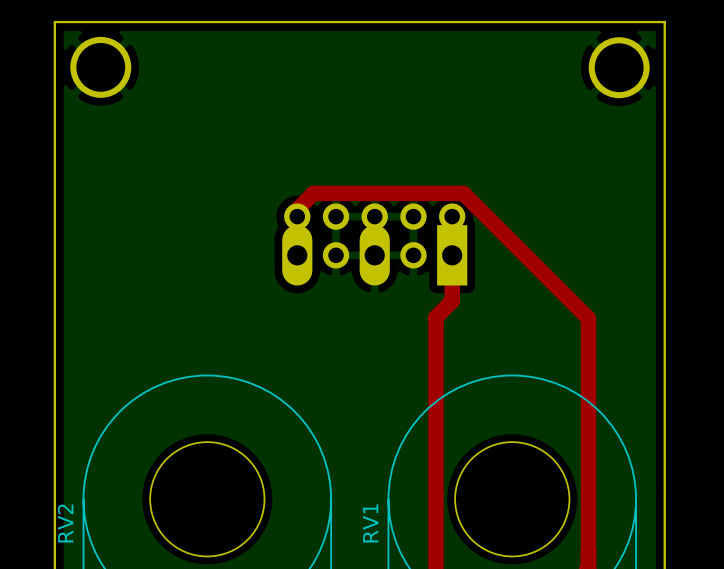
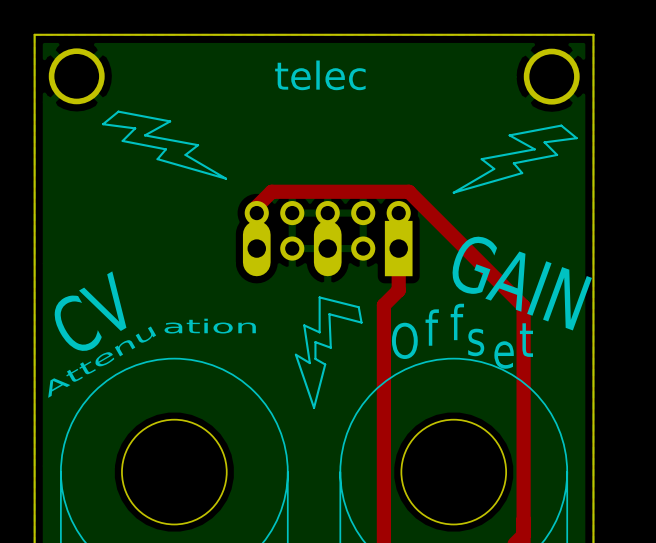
text: none -> telec (320, 75)
line: none -> (118, 111) (170, 121) (145, 135) (198, 145) (185, 154) (226, 178) (157, 159) (165, 149) (122, 140) (135, 128) (103, 124) (118, 111)
line: none -> (561, 125) (576, 138) (544, 142) (557, 154) (513, 163) (522, 173) (453, 192) (494, 168) (481, 159) (534, 149) (509, 135) (561, 125)
text: none -> GAIN (521, 282)
line: none -> (319, 297) (319, 332) (304, 325) (309, 363) (295, 354) (314, 407) (325, 364) (315, 358) (315, 342) (330, 347) (329, 314) (361, 322) (358, 307) (319, 297)
text: none -> CV (90, 312)
text: none -> f (457, 321)
text: none -> ation (210, 326)
text: none -> f (432, 327)
text: none -> t (526, 340)
text: none -> O (404, 340)
text: none -> s (476, 342)
text: none -> e (504, 355)
text: none -> Attenu (102, 362)
RV2 name: RV2 (65, 523) -> none
RV1 name: RV1 (370, 523) -> none

